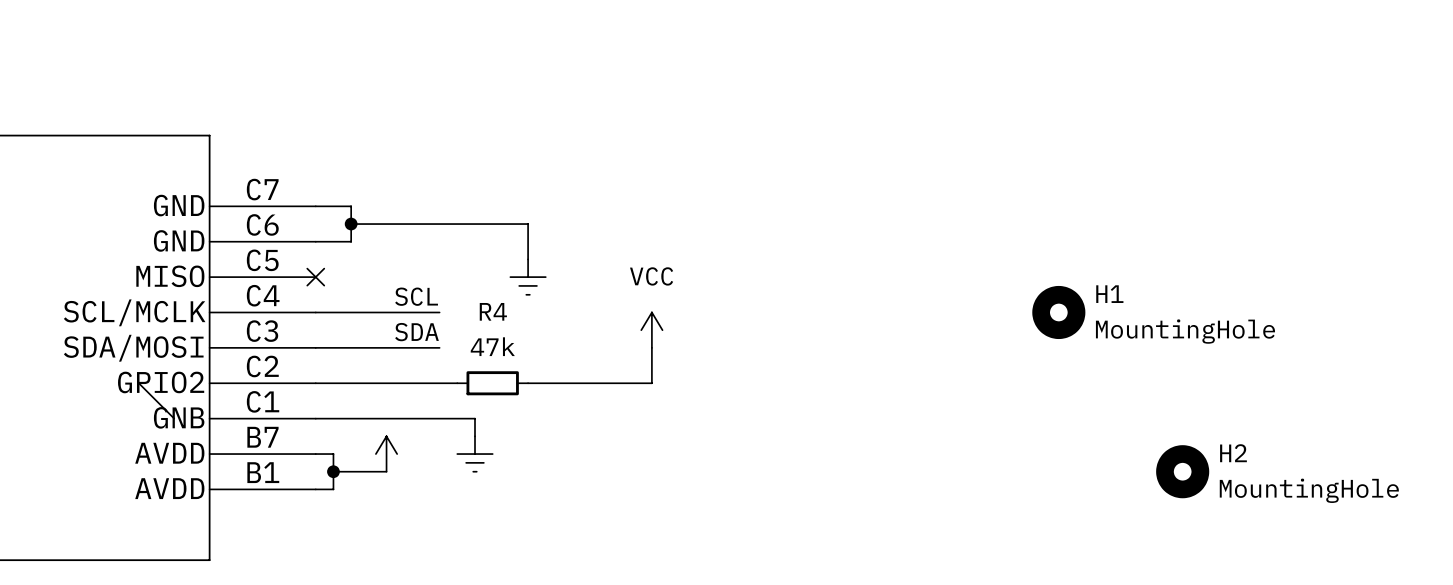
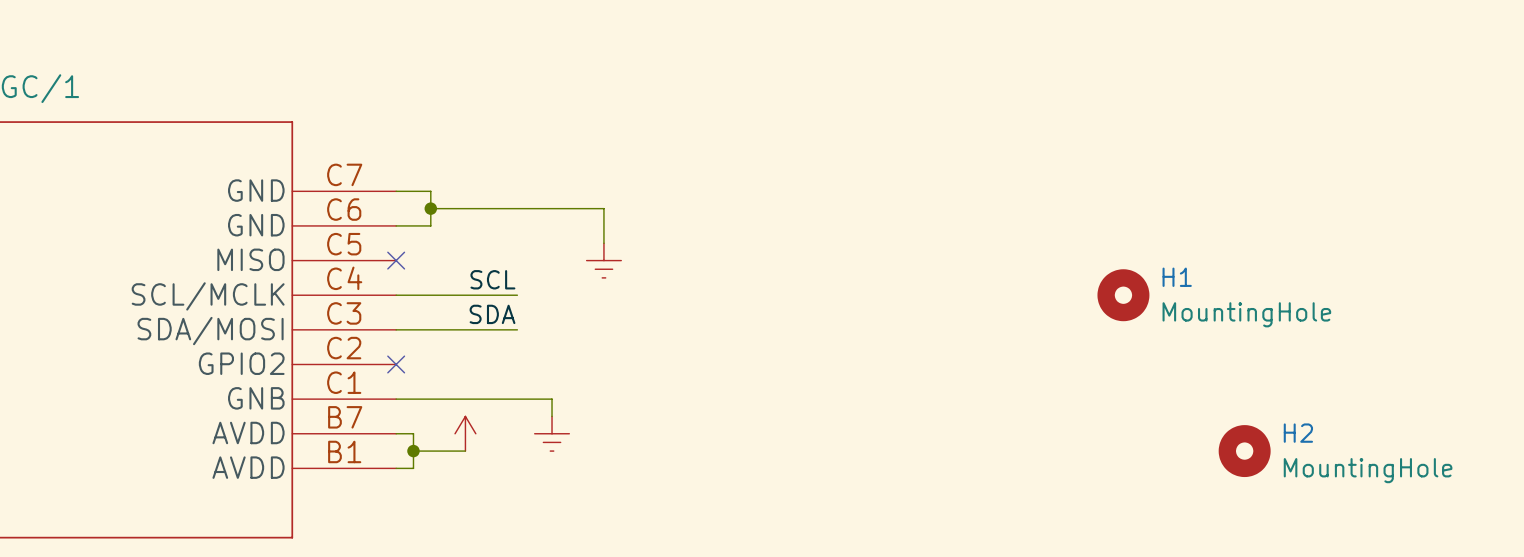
power symbol: VCC (651, 330) -> none
wire: (651, 347) (651, 383) (528, 383) -> none
wire: (138, 383) (174, 418) -> none
wire: (315, 383) (457, 383) -> none
no-connect mark: none -> (396, 364)
R4: 47k (492, 383) -> none

